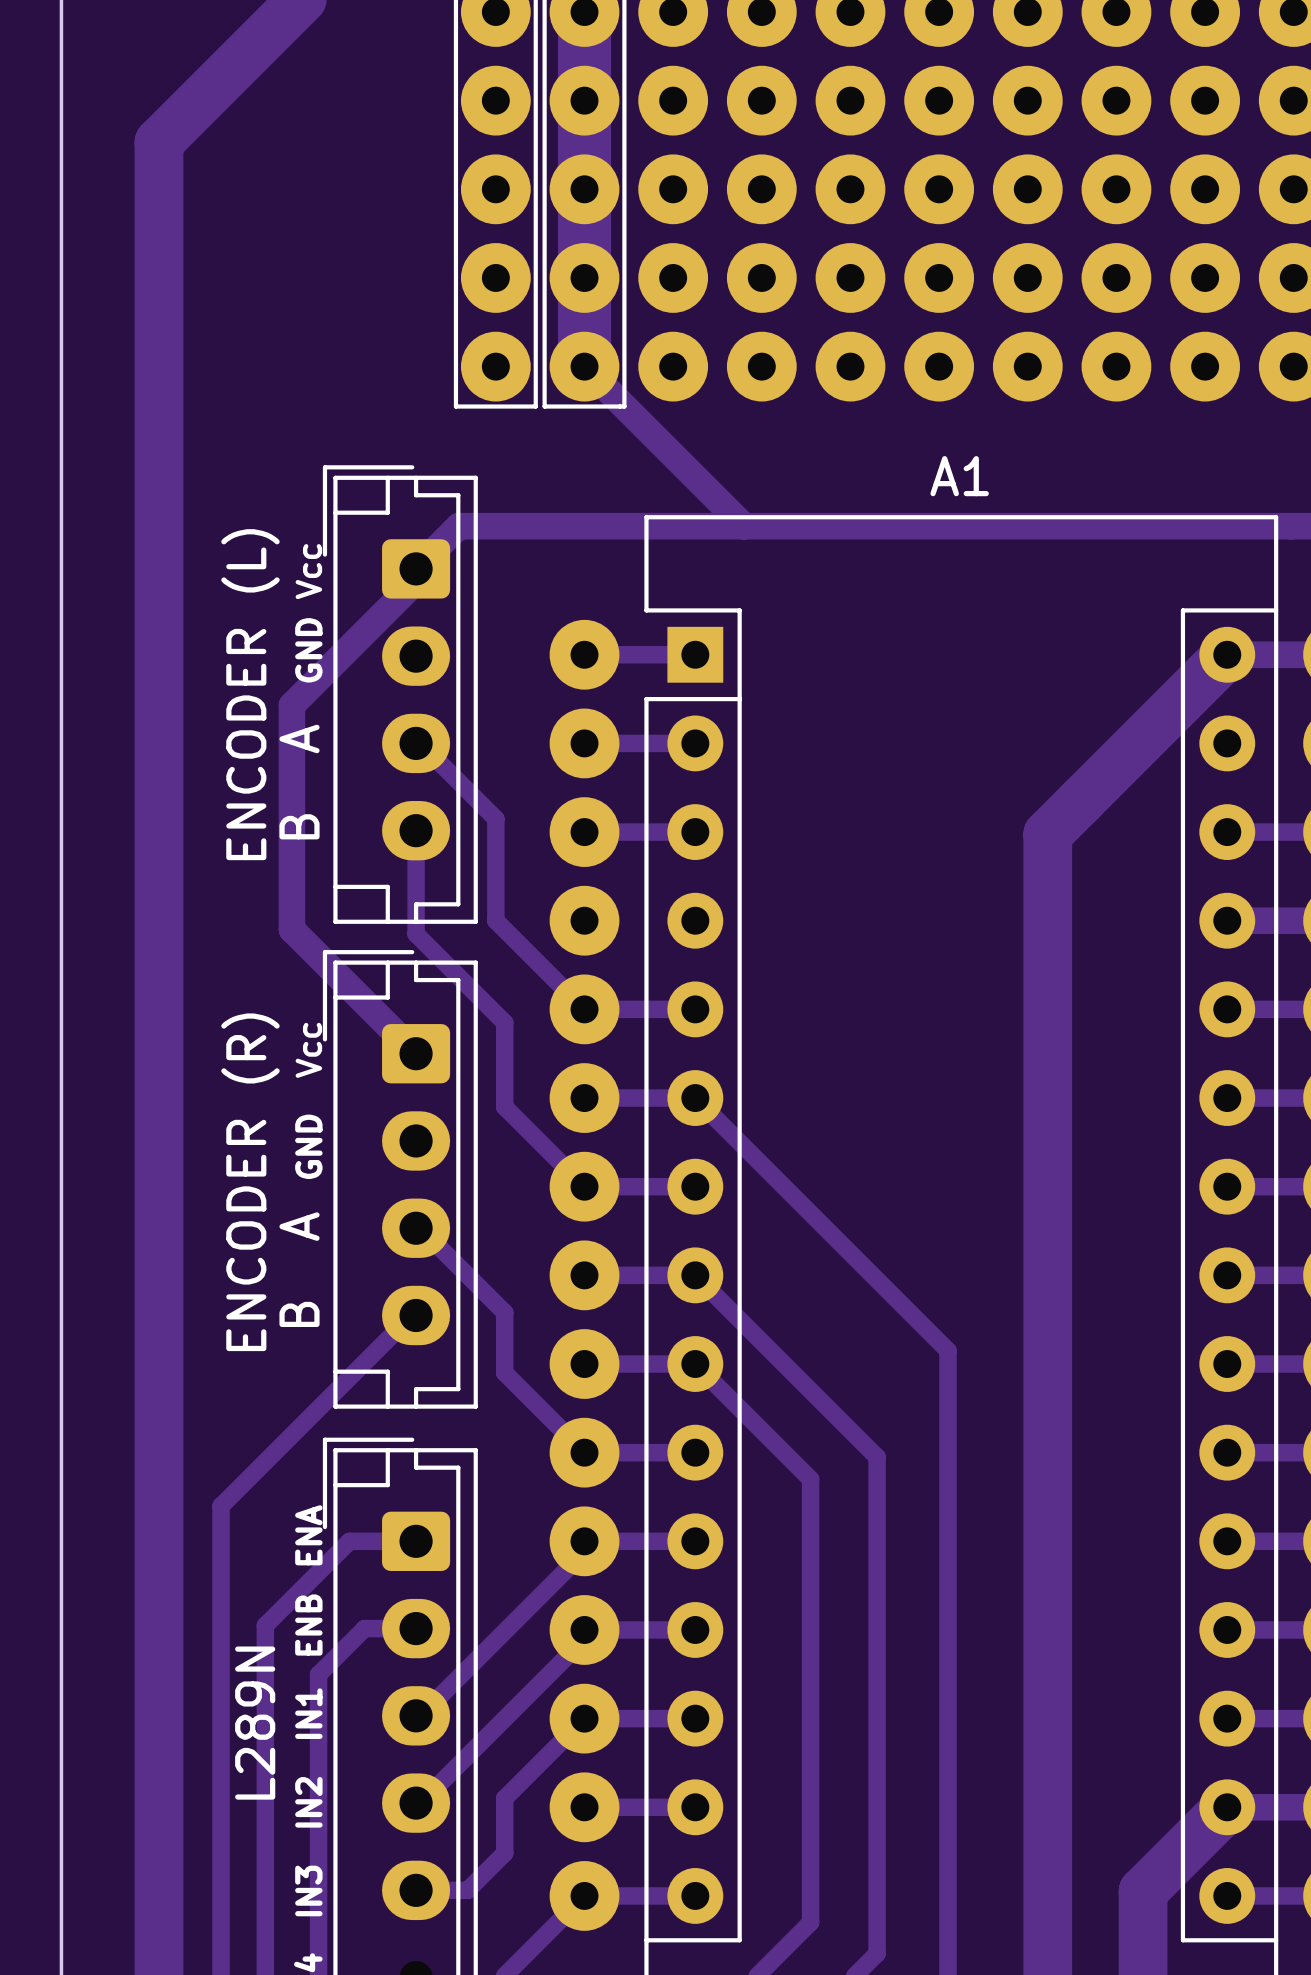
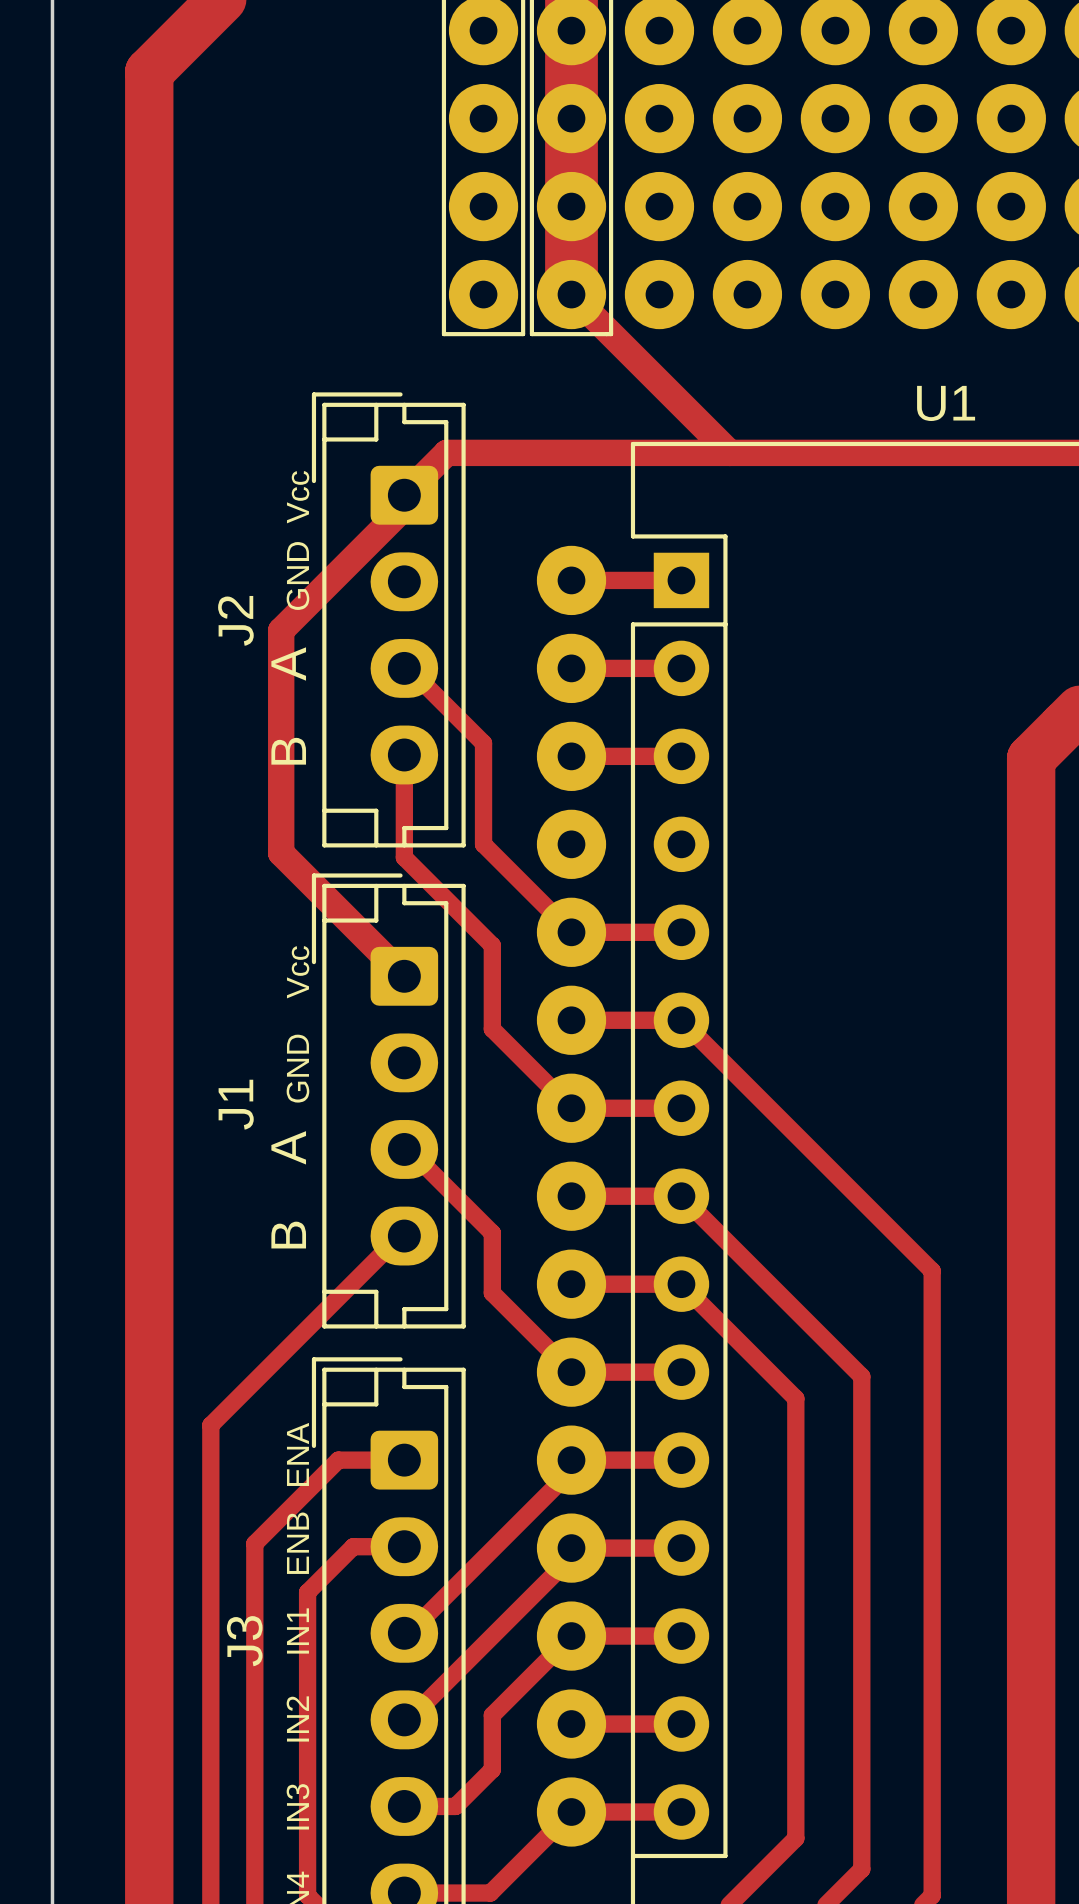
A1 name: A1 (959, 476) -> U1 (946, 403)
ENCODER (L) name: ENCODER (L) (250, 694) -> J2 (235, 620)
ENCODER (R) name: ENCODER (R) (250, 1182) -> J1 (236, 1104)
L289N name: L289N (255, 1723) -> J3 (244, 1641)

